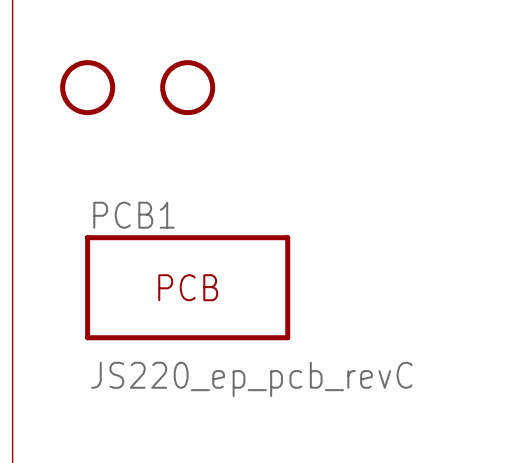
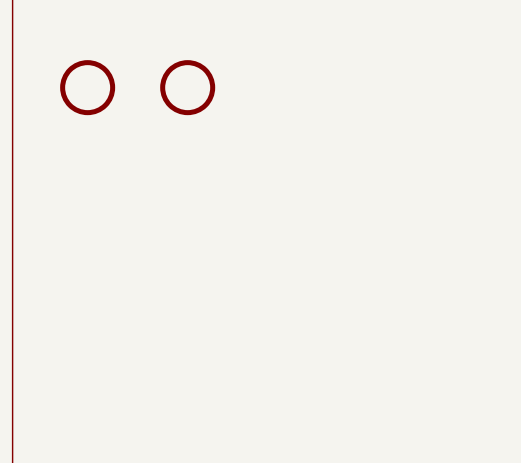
PCB1: JS220_ep_pcb_revC (187, 287) -> none

